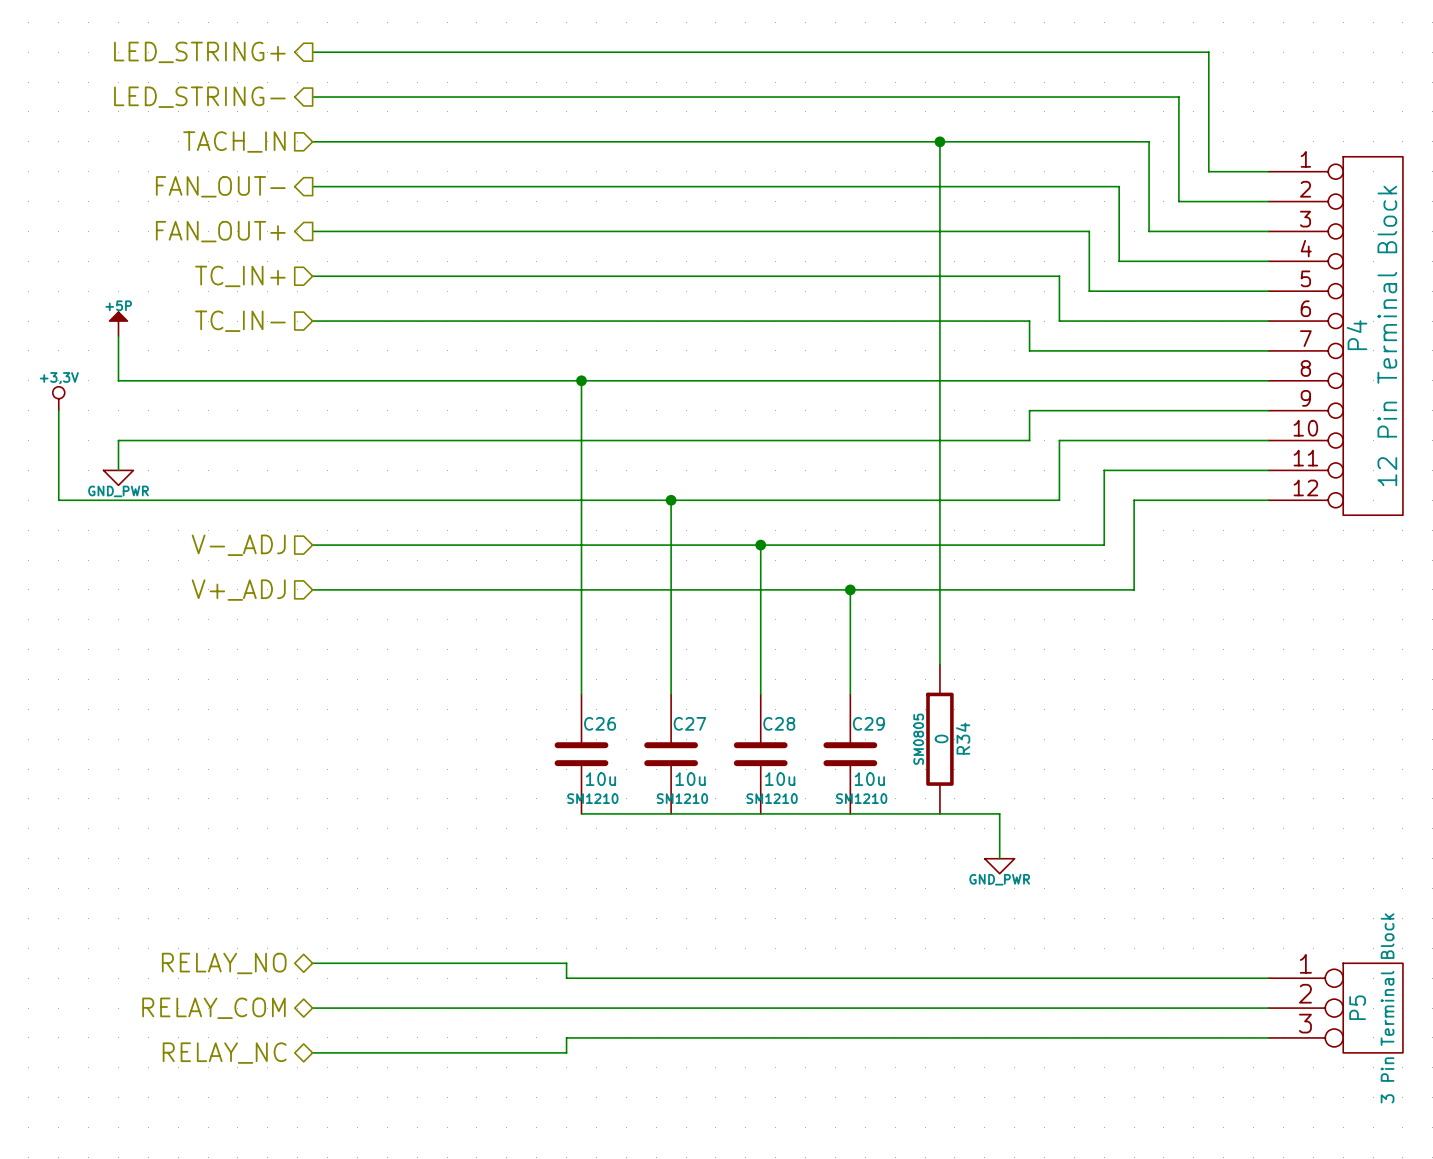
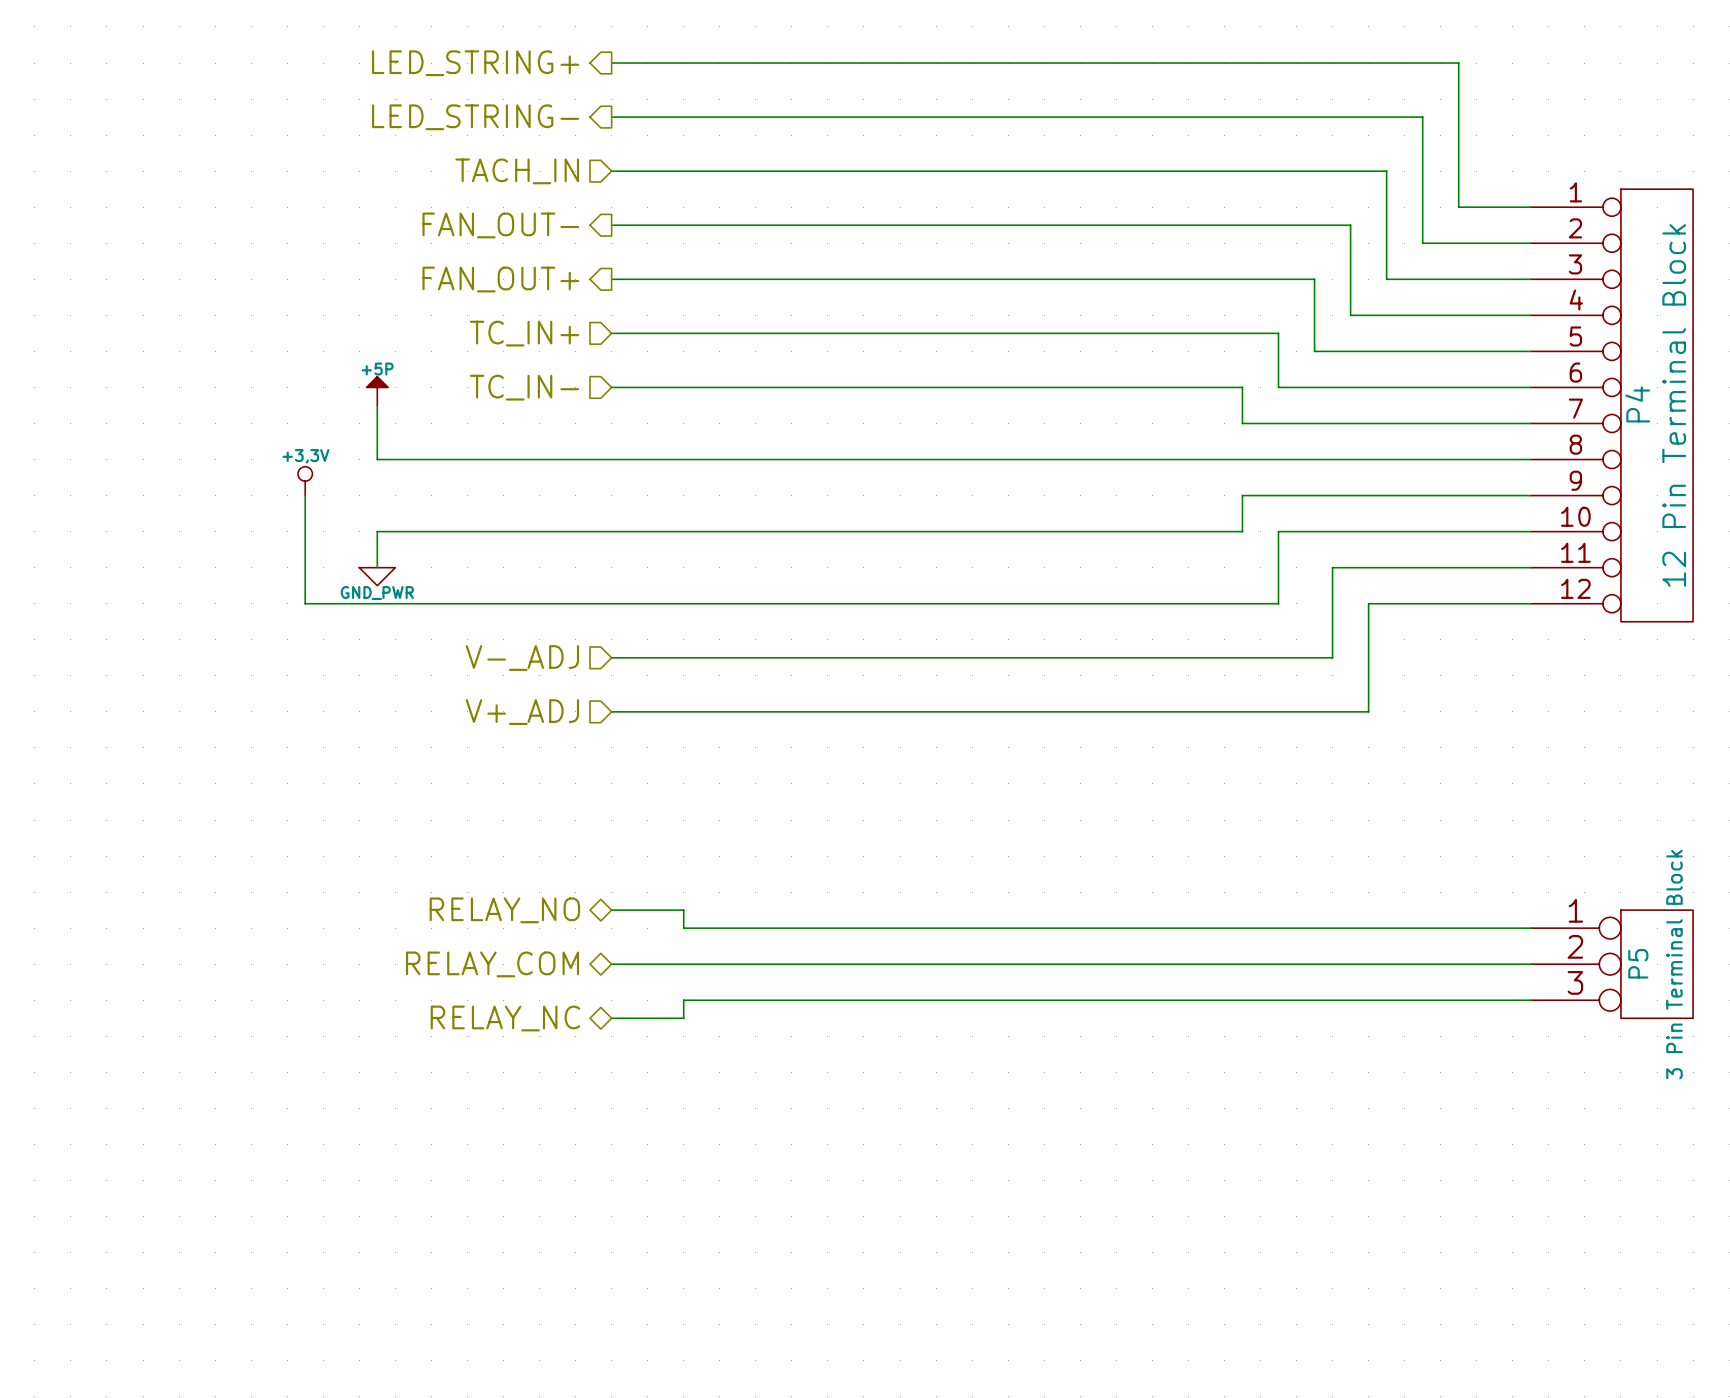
hierarchical label position: LED_STRING+ (199, 52) -> LED_STRING+ (475, 63)
wire: (312, 52) (506, 52) -> none
hierarchical label position: LED_STRING- (199, 97) -> LED_STRING- (475, 117)
wire: (312, 97) (506, 97) -> none
wire: (312, 141) (506, 141) -> none
wire: (939, 141) (939, 664) -> none
junction: (939, 141) -> none
hierarchical label position: TACH_IN (234, 142) -> TACH_IN (517, 171)
hierarchical label position: FAN_OUT- (220, 186) -> FAN_OUT- (500, 225)
wire: (312, 186) (506, 186) -> none
hierarchical label position: FAN_OUT+ (220, 231) -> FAN_OUT+ (500, 279)
wire: (312, 231) (506, 231) -> none
hierarchical label position: TC_IN+ (240, 276) -> TC_IN+ (524, 333)
wire: (312, 276) (506, 276) -> none
hierarchical label position: TC_IN- (240, 321) -> TC_IN- (524, 387)
wire: (312, 321) (506, 321) -> none
power symbol position: +5P (118, 324) -> +5P (377, 391)
wire: (118, 335) (118, 380) (312, 380) -> (377, 405) (377, 459)
wire: (581, 380) (581, 694) -> none
junction: (581, 380) -> none
power symbol position: +3,3V (58, 398) -> +3,3V (305, 481)
wire: (58, 410) (58, 500) (252, 500) -> (305, 495) (305, 603)
wire: (312, 440) (118, 440) (118, 470) -> (377, 531) (377, 567)
power symbol position: GND_PWR (118, 477) -> GND_PWR (377, 576)
wire: (671, 500) (671, 694) -> none
junction: (671, 500) -> none
hierarchical label position: V-_ADJ (238, 545) -> V-_ADJ (522, 658)
wire: (312, 545) (506, 545) -> none
wire: (760, 545) (760, 694) -> none
junction: (760, 545) -> none
wire: (312, 589) (506, 589) -> none
wire: (850, 589) (850, 694) -> none
junction: (850, 589) -> none
hierarchical label position: V+_ADJ (238, 590) -> V+_ADJ (522, 712)
R34: 0 (939, 739) -> none
wire: none -> (611, 910) (683, 910) (683, 928) (1530, 928)
C26: 10u (581, 754) -> none
C27: 10u (671, 754) -> none
C28: 10u (760, 754) -> none
C29: 10u (850, 754) -> none
wire: none -> (611, 964) (1530, 964)
wire: (581, 813) (999, 813) (999, 858) -> none
wire: none -> (1530, 1000) (683, 1000) (683, 1018) (611, 1018)
power symbol: GND_PWR (999, 866) -> none
hierarchical label position: RELAY_NO (224, 963) -> RELAY_NO (504, 910)
wire: (312, 963) (566, 963) (566, 978) (1268, 978) -> none
hierarchical label position: RELAY_COM (213, 1008) -> RELAY_COM (492, 964)
wire: (312, 1008) (1268, 1008) -> none
P5 position: (1335, 1008) -> (1611, 964)
wire: (1268, 1037) (566, 1037) (566, 1052) (312, 1052) -> none
hierarchical label position: RELAY_NC (224, 1053) -> RELAY_NC (505, 1018)

